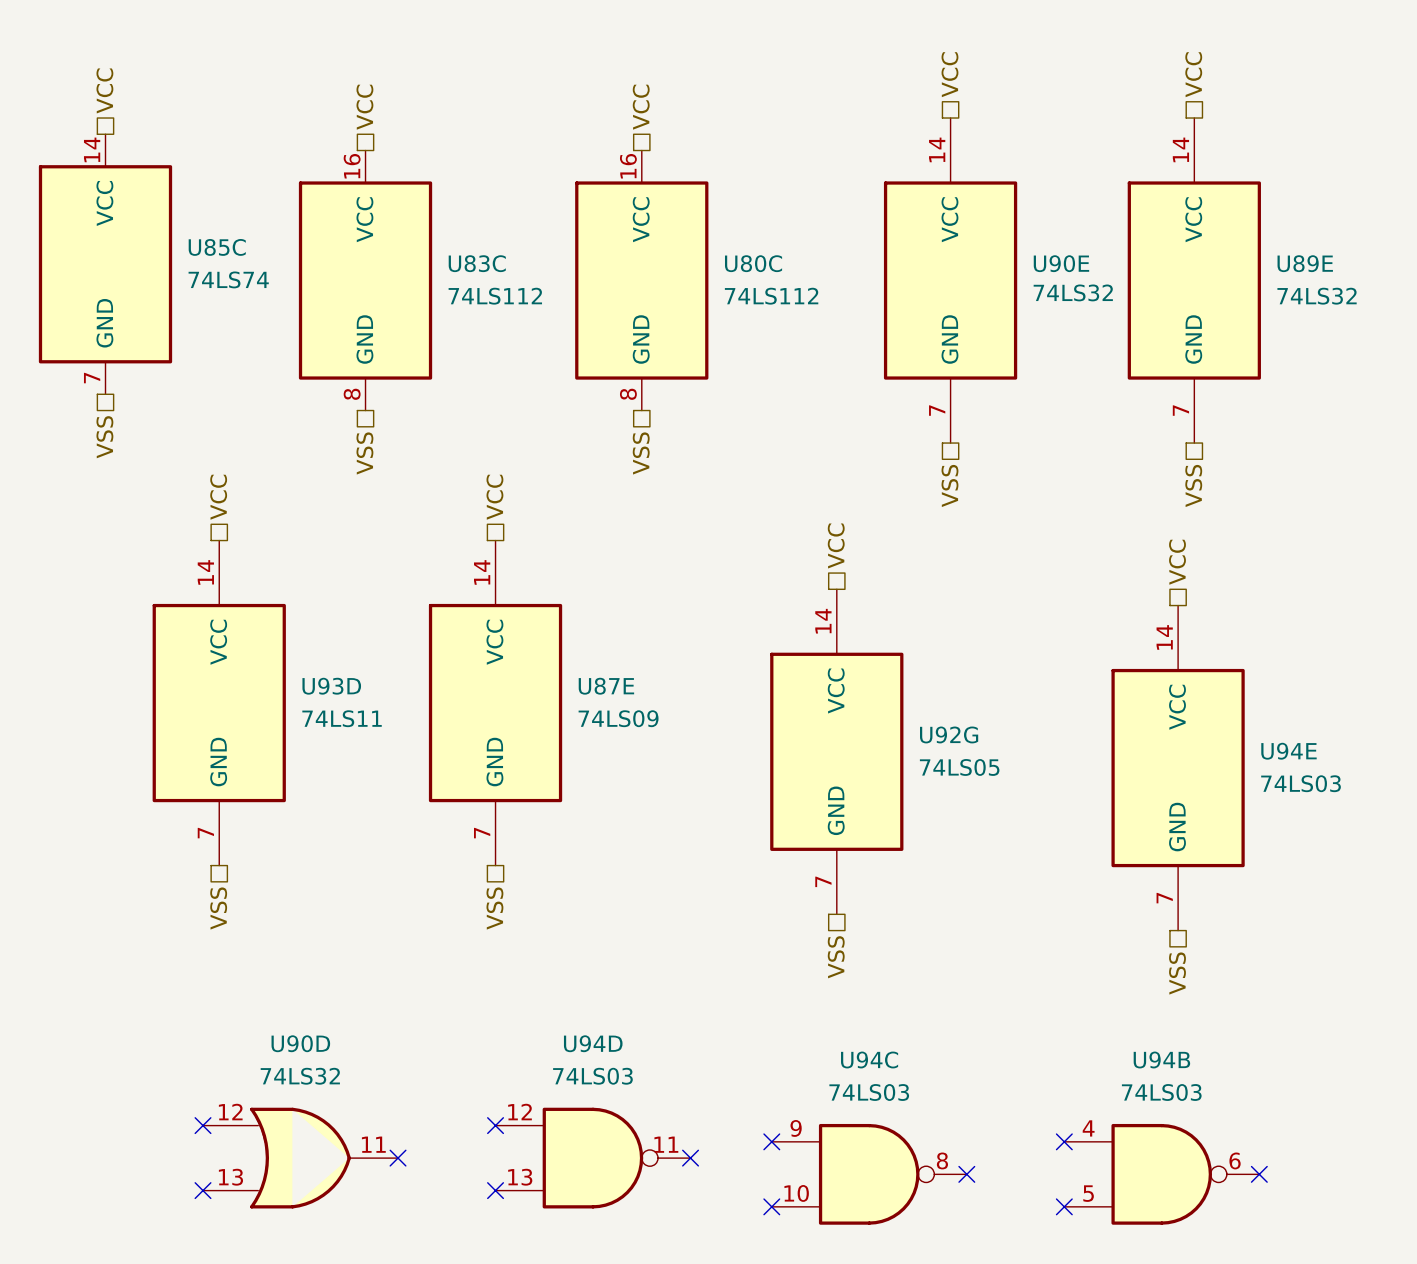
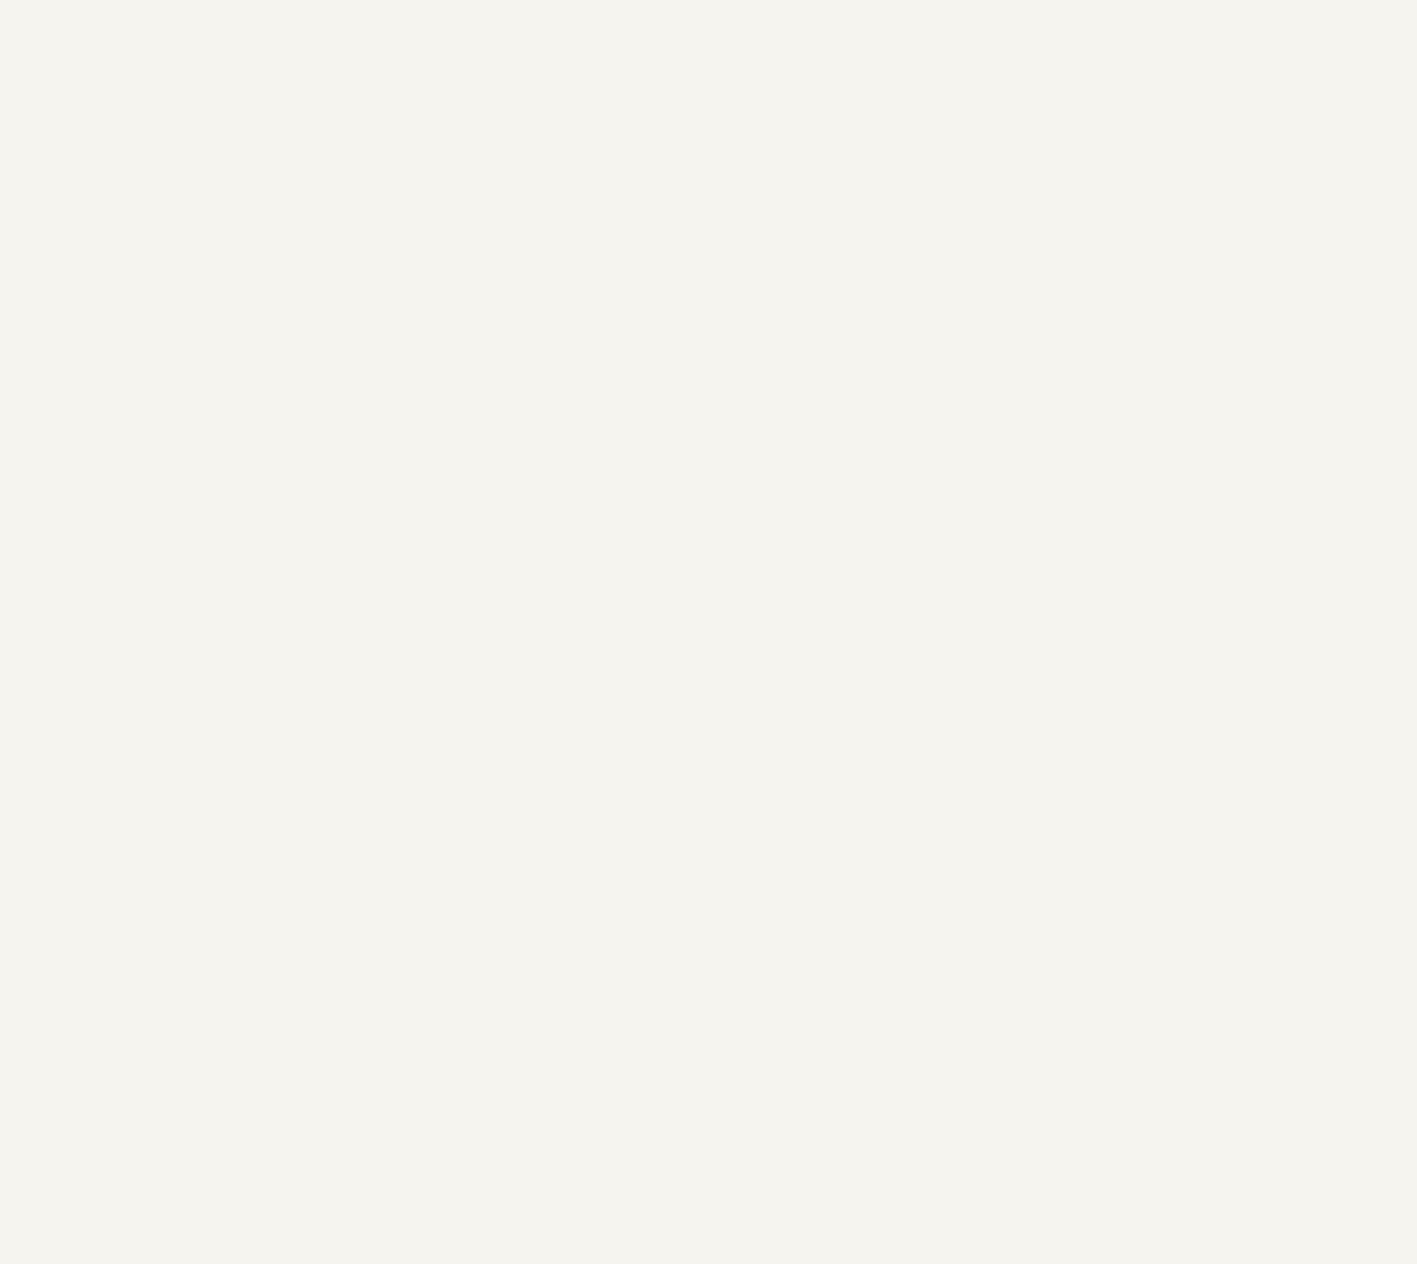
hierarchical label: VCC (949, 74) -> none
hierarchical label: VCC (1193, 74) -> none
hierarchical label: VCC (104, 90) -> none
hierarchical label: VCC (364, 107) -> none
hierarchical label: VCC (641, 107) -> none
U85C: 74LS74 (105, 264) -> none
U83C: 74LS112 (365, 280) -> none
U80C: 74LS112 (641, 280) -> none
U90E: 74LS32 (950, 280) -> none
U89E: 74LS32 (1194, 280) -> none
hierarchical label: VSS (104, 437) -> none
hierarchical label: VSS (364, 453) -> none
hierarchical label: VSS (641, 453) -> none
hierarchical label: VSS (949, 485) -> none
hierarchical label: VSS (1193, 485) -> none
hierarchical label: VCC (218, 497) -> none
hierarchical label: VCC (494, 497) -> none
hierarchical label: VCC (836, 545) -> none
hierarchical label: VCC (1177, 562) -> none
U93D: 74LS11 (219, 703) -> none
U87E: 74LS09 (495, 703) -> none
U92G: 74LS05 (836, 751) -> none
U94E: 74LS03 (1178, 768) -> none
hierarchical label: VSS (218, 908) -> none
hierarchical label: VSS (494, 908) -> none
hierarchical label: VSS (836, 957) -> none
hierarchical label: VSS (1177, 973) -> none
no-connect mark: (203, 1125) -> none
no-connect mark: (495, 1125) -> none
no-connect mark: (771, 1141) -> none
no-connect mark: (1064, 1141) -> none
U90D: 74LS32 (300, 1158) -> none
no-connect mark: (398, 1158) -> none
U94D: 74LS03 (593, 1158) -> none
no-connect mark: (690, 1158) -> none
U94C: 74LS03 (869, 1174) -> none
no-connect mark: (966, 1174) -> none
U94B: 74LS03 (1161, 1174) -> none
no-connect mark: (1259, 1174) -> none
no-connect mark: (203, 1190) -> none
no-connect mark: (495, 1190) -> none
no-connect mark: (771, 1206) -> none
no-connect mark: (1064, 1206) -> none

